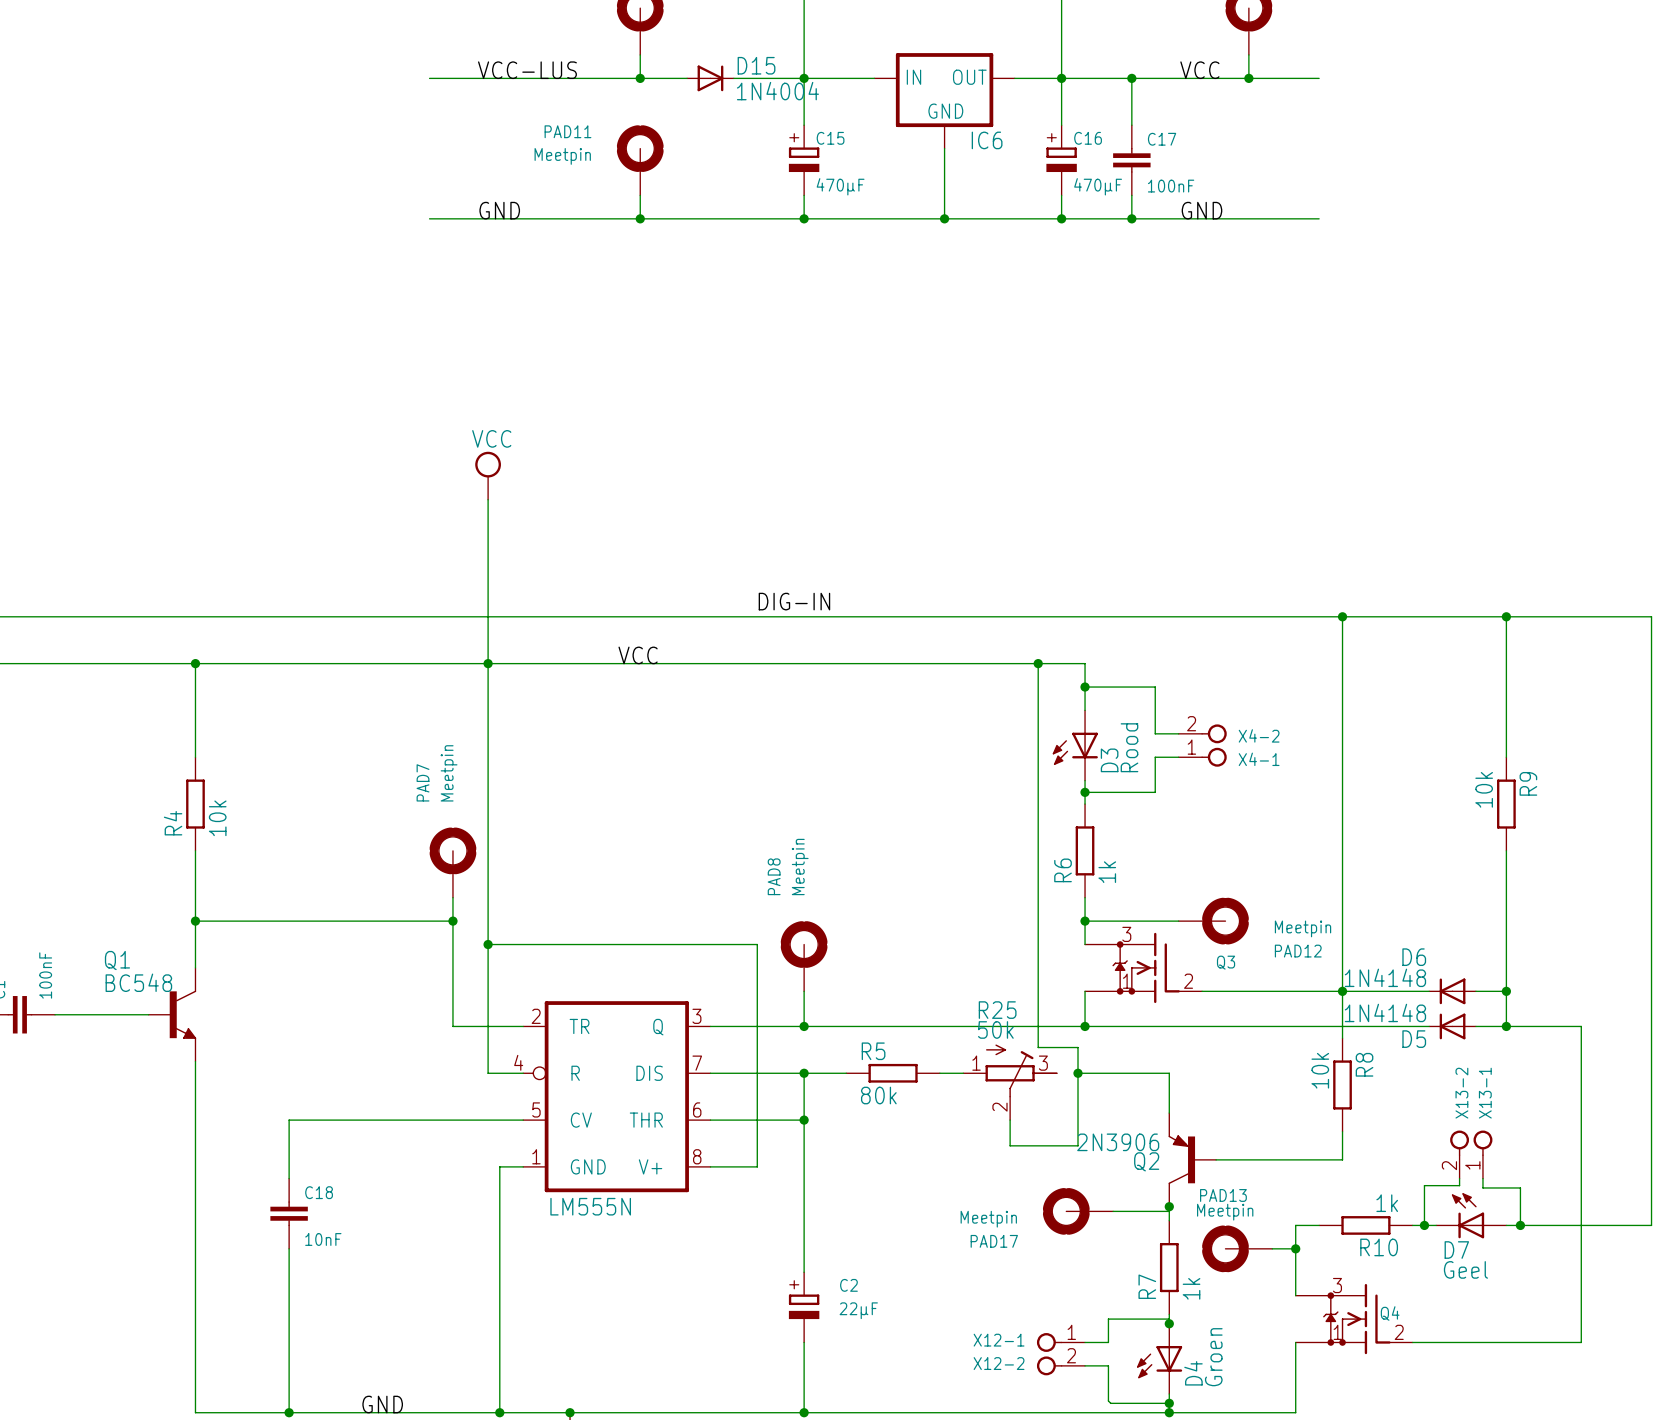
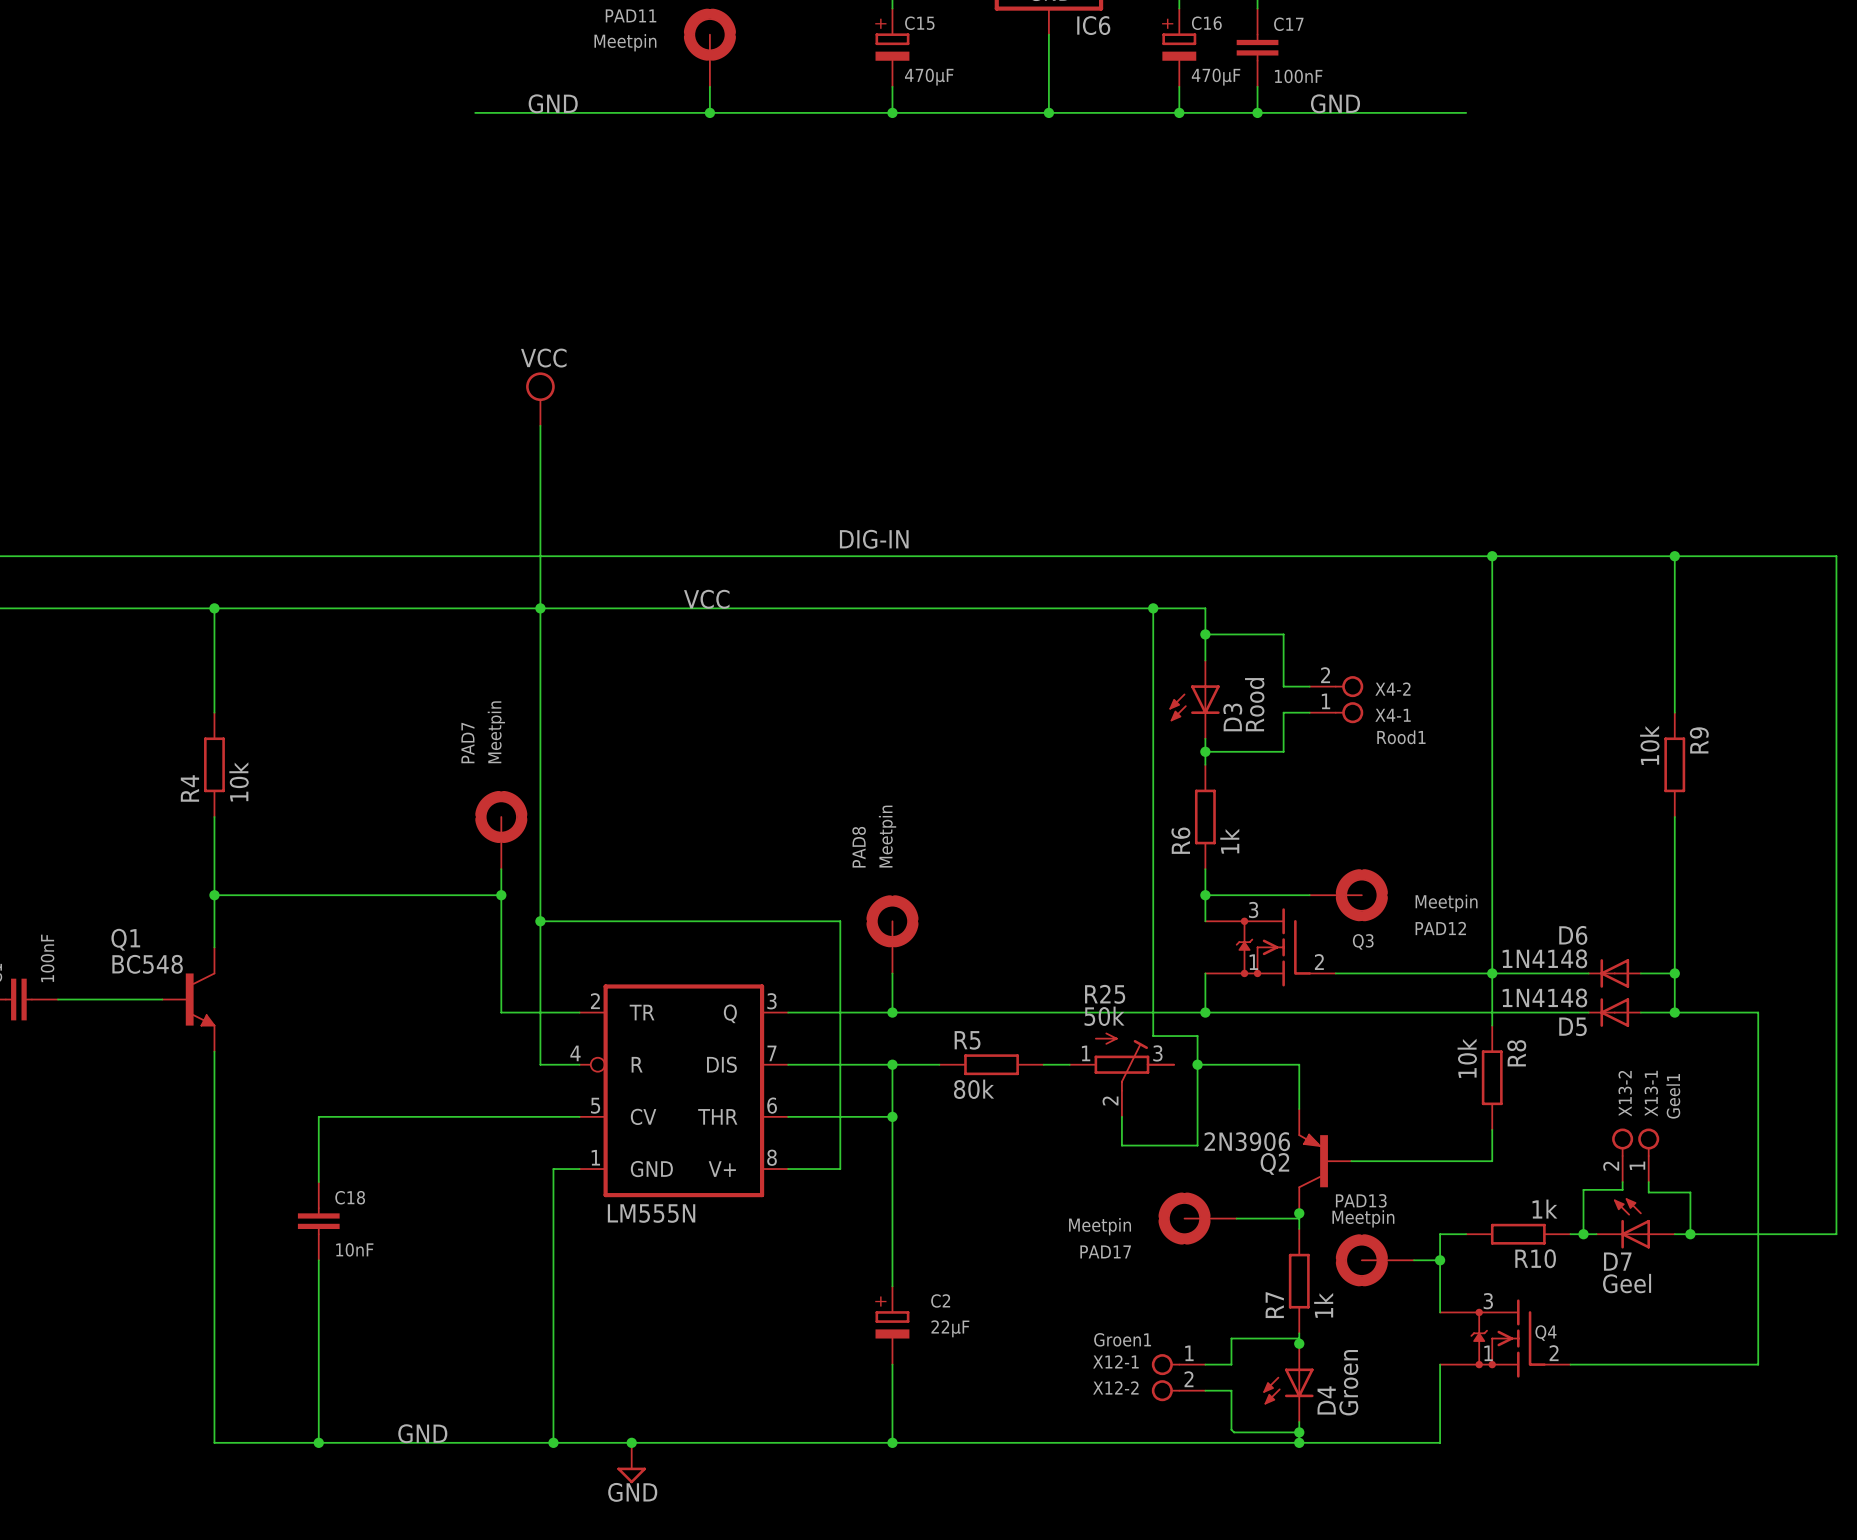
X4-2 value: none -> Rood1 (1401, 737)
X13-2 value: none -> Geel1 (1673, 1096)
X12-2 value: none -> Groen1 (1122, 1339)

